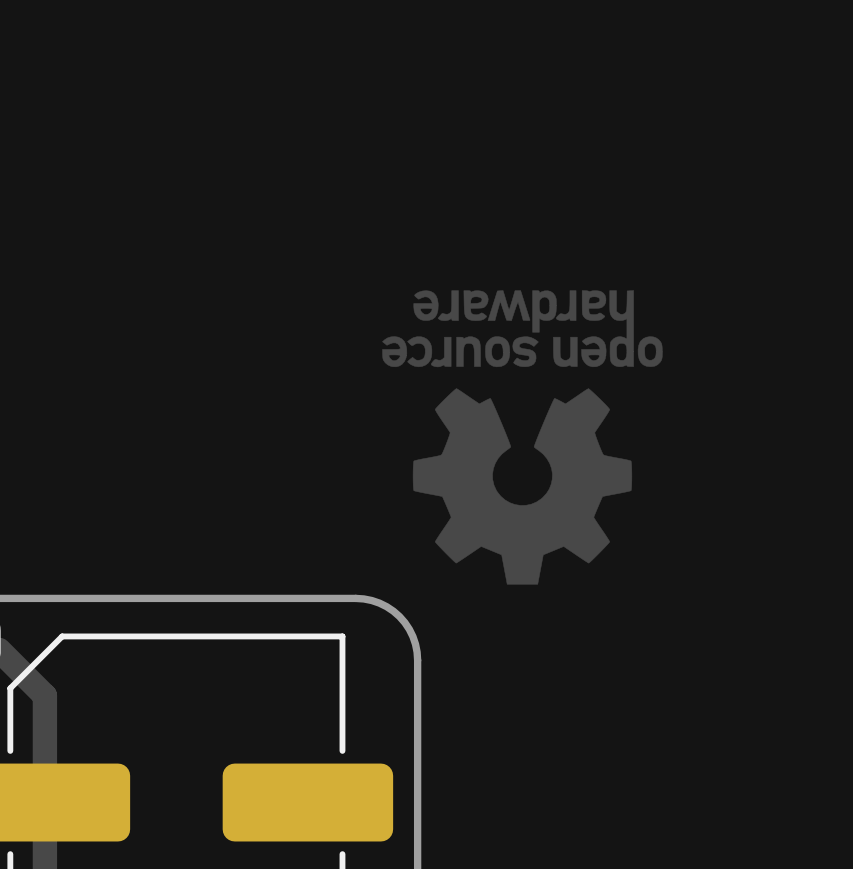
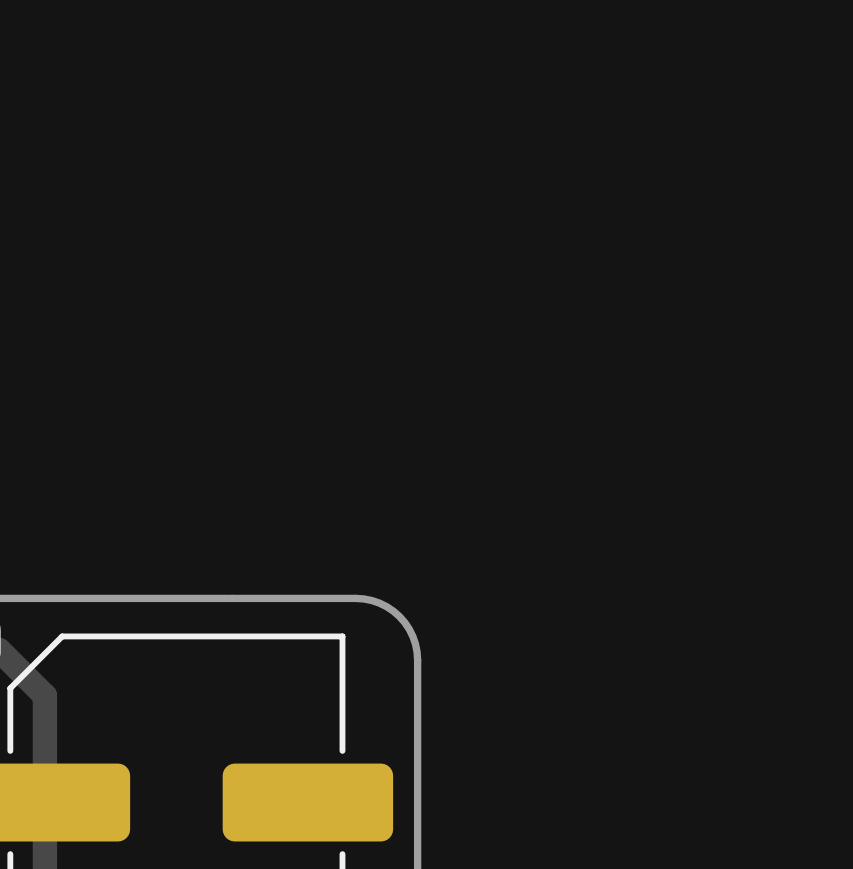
drawing: [382, 290, 663, 585] -> none

